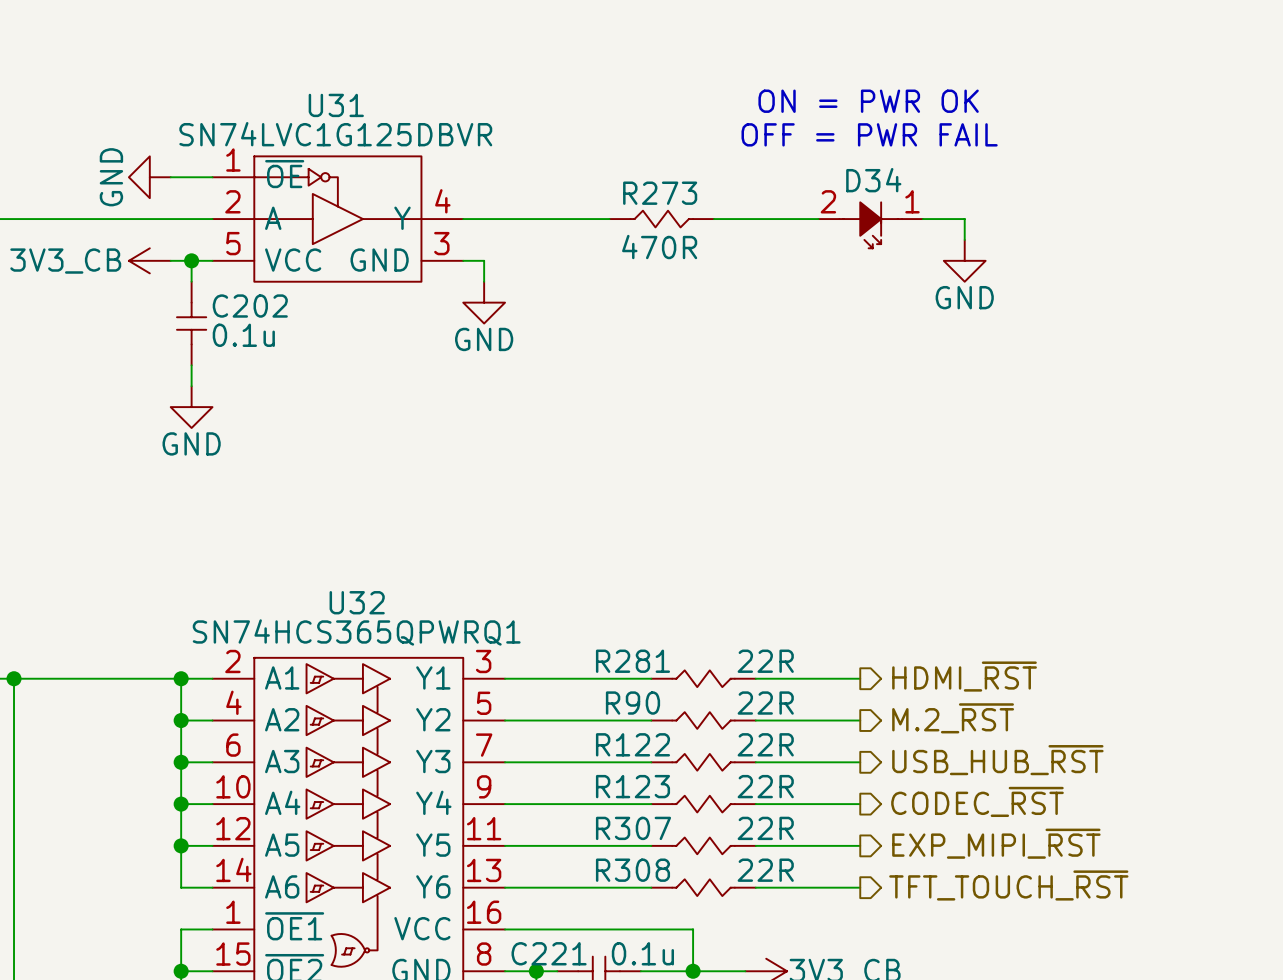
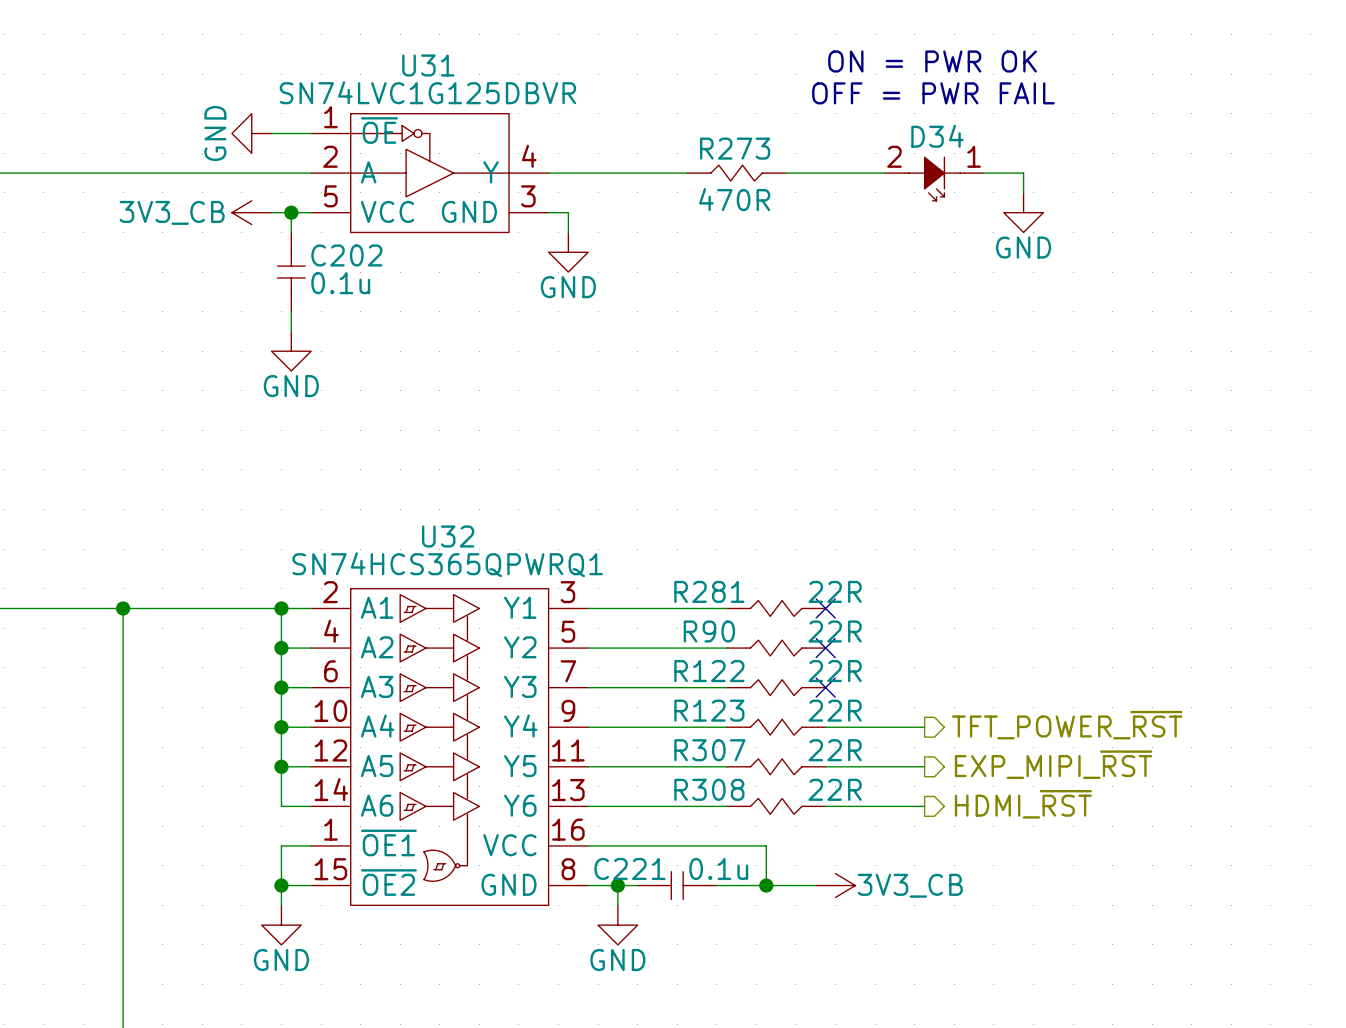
hierarchical label: HDMI_~{RST} (964, 676) -> none
wire: (755, 678) (860, 678) -> none
no-connect mark: none -> (825, 608)
hierarchical label: M.2_~{RST} (953, 718) -> none
wire: (755, 720) (860, 720) -> none
no-connect mark: none -> (825, 648)
hierarchical label: USB_HUB_~{RST} (997, 760) -> none
wire: (755, 762) (860, 762) -> none
no-connect mark: none -> (825, 687)
hierarchical label: CODEC_~{RST} (977, 801) -> TFT_POWER_~{RST} (1067, 725)
hierarchical label: TFT_TOUCH_~{RST} (1008, 885) -> HDMI_~{RST} (1023, 804)

